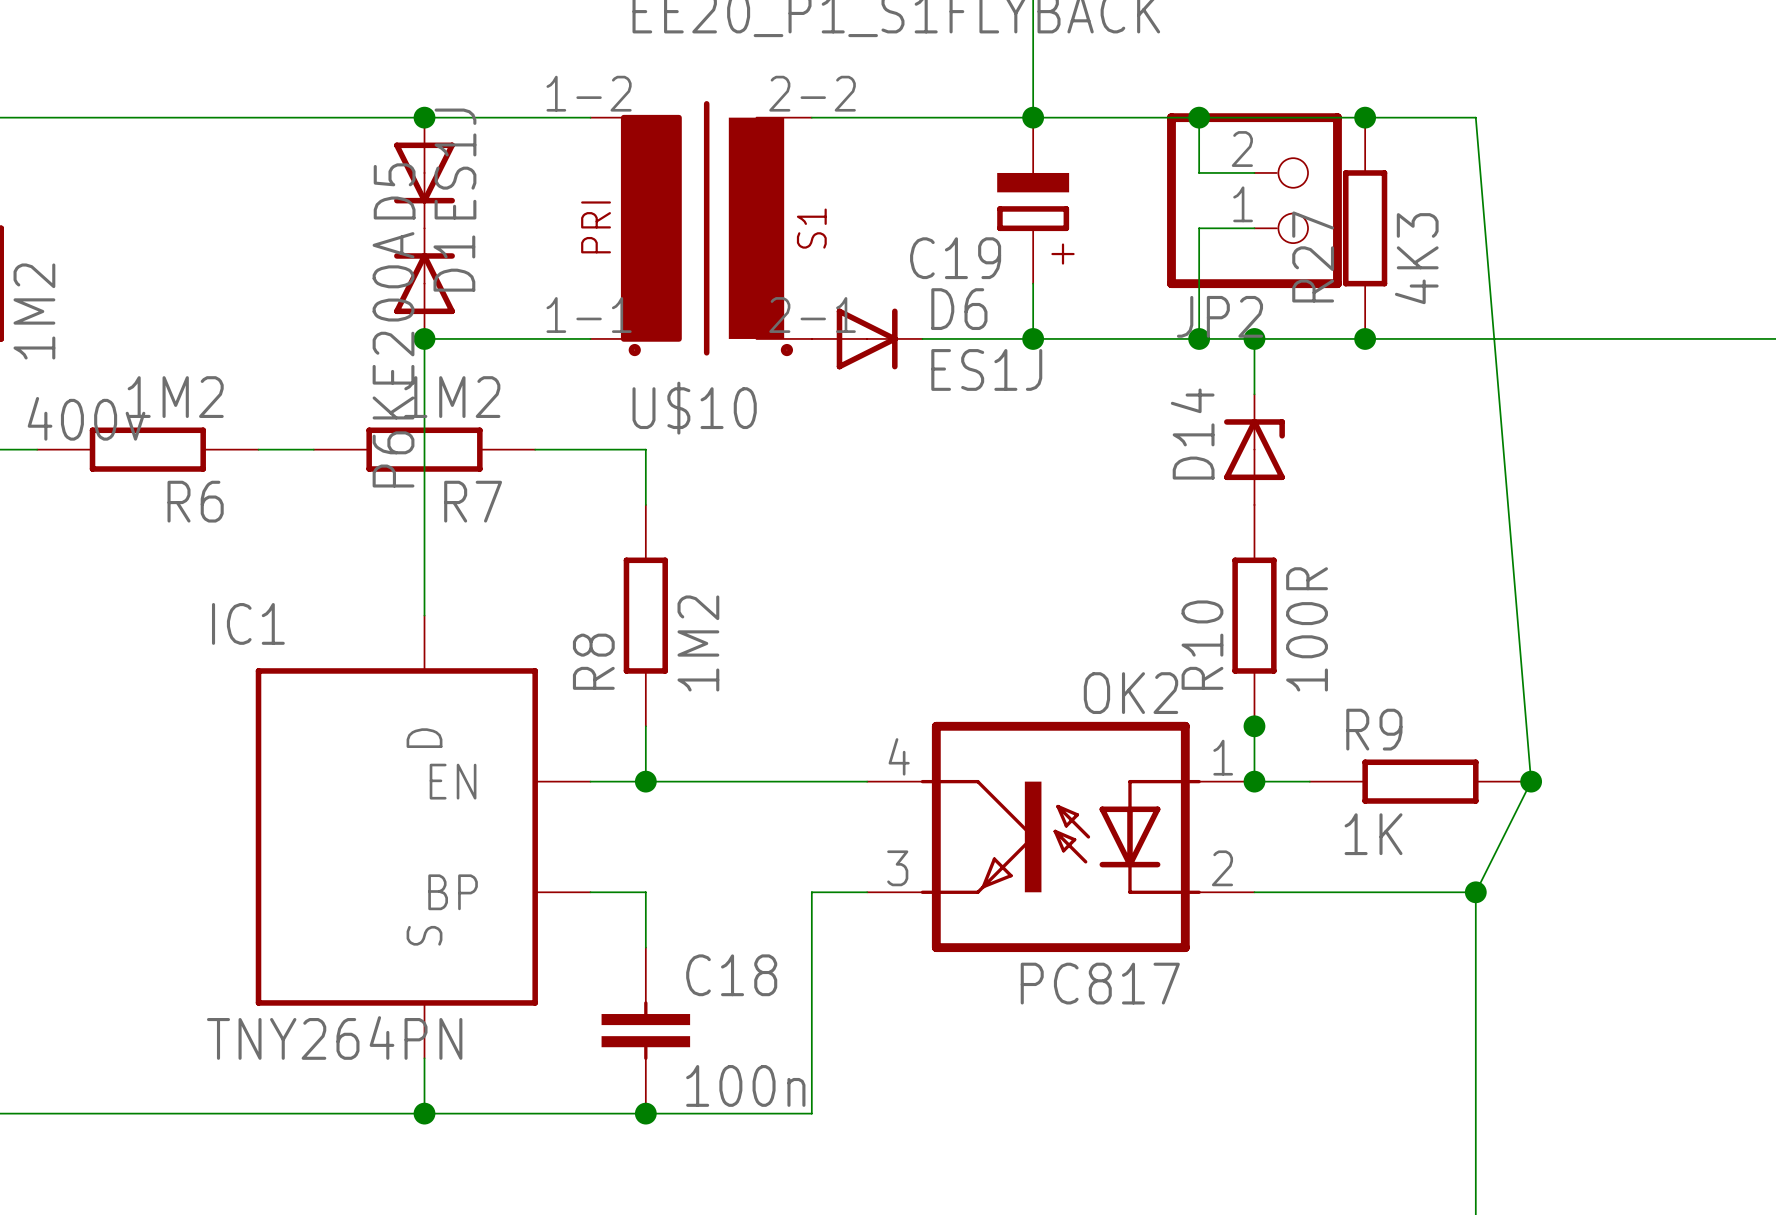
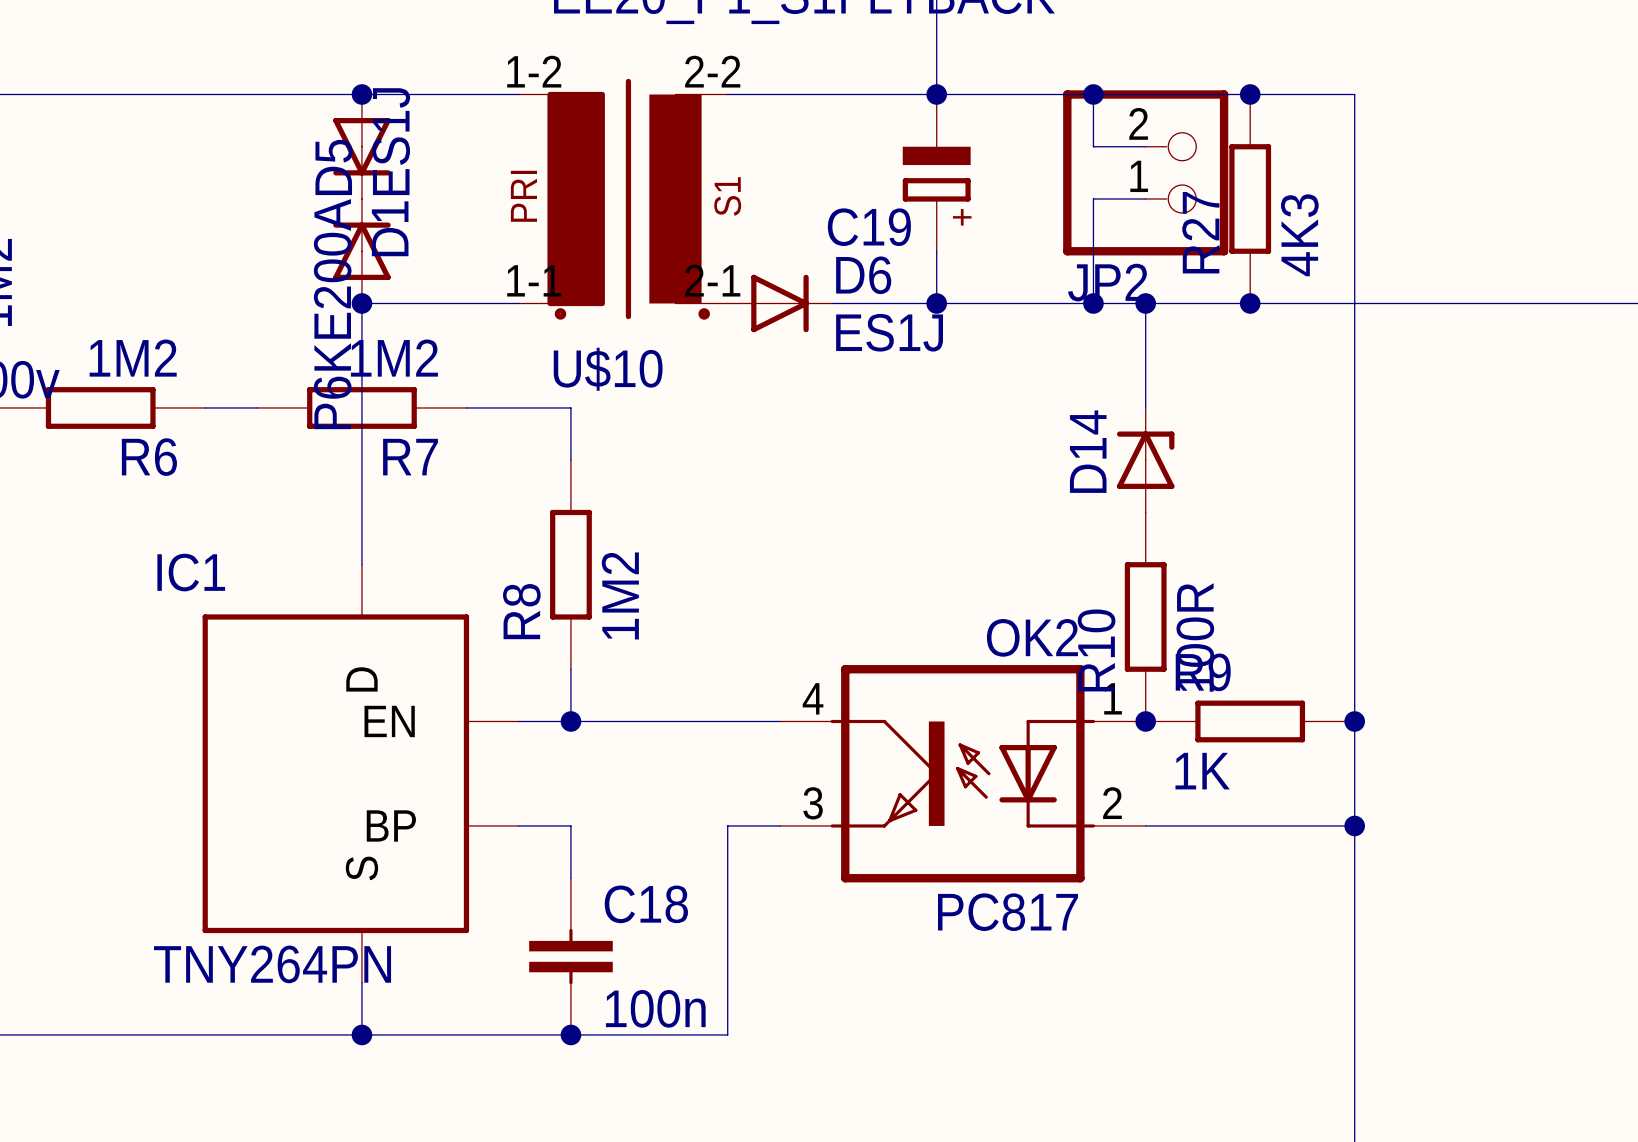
wire: (1475, 117) (1531, 781) (1475, 892) -> (1354, 94) (1354, 825)
D14 position: (1254, 449) -> (1145, 460)
R10 position: (1254, 615) -> (1145, 616)
junction: (1254, 726) -> none
R9 position: (1420, 781) -> (1250, 721)
junction position: (1531, 781) -> (1354, 721)

